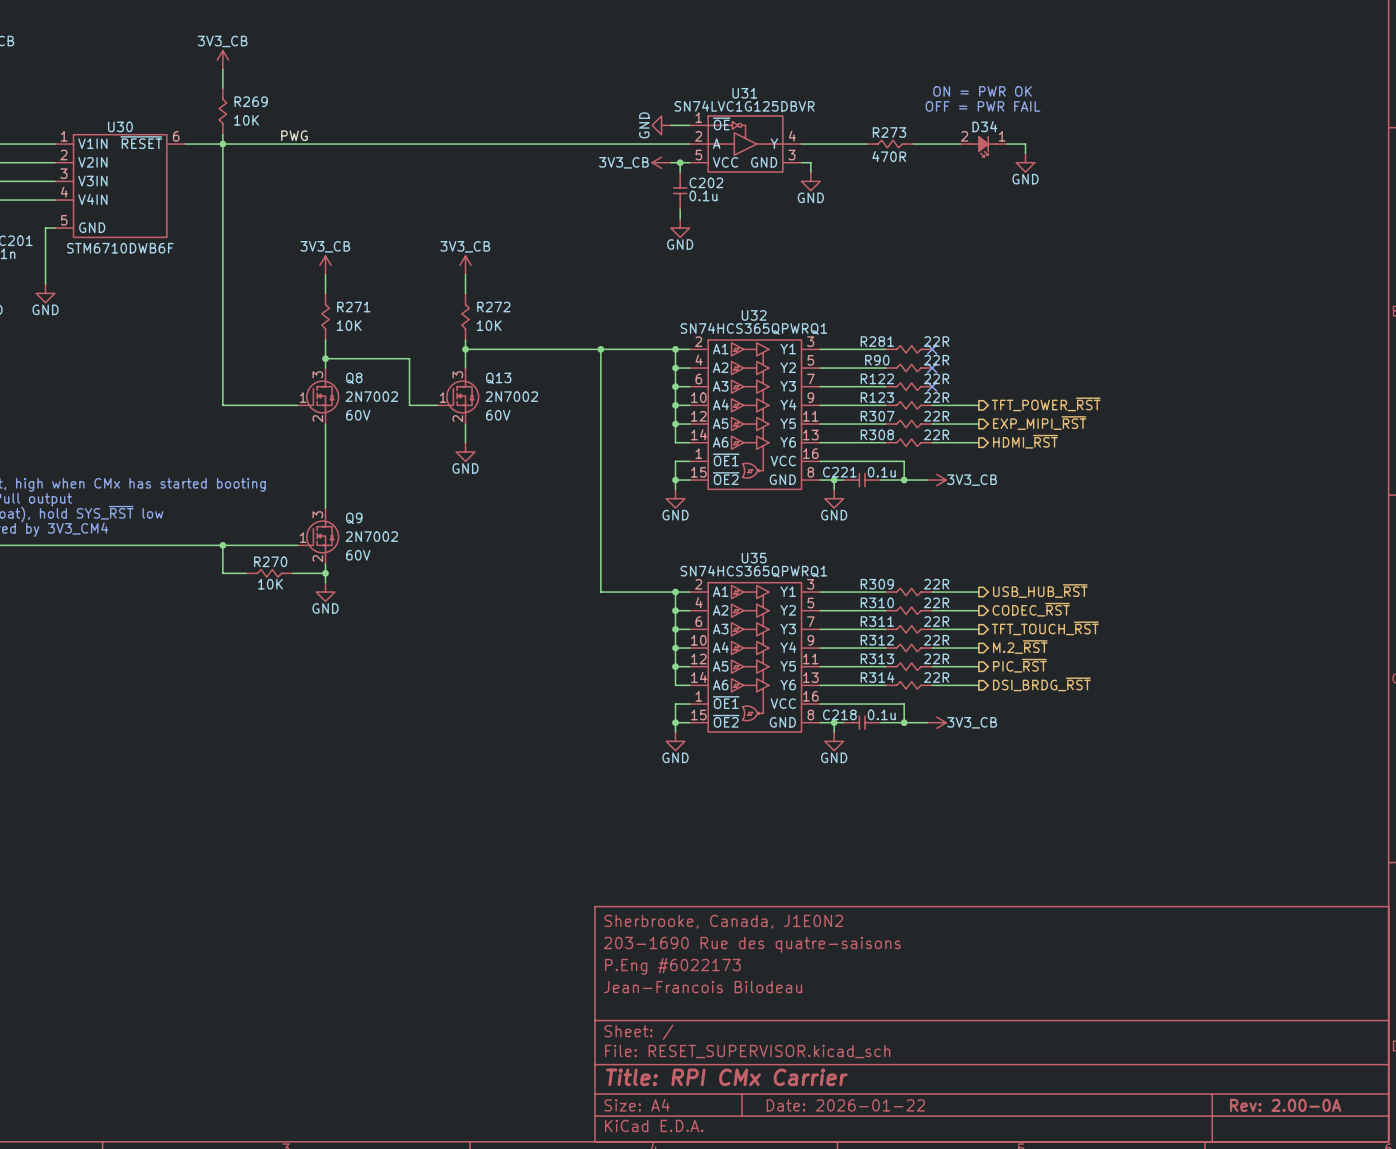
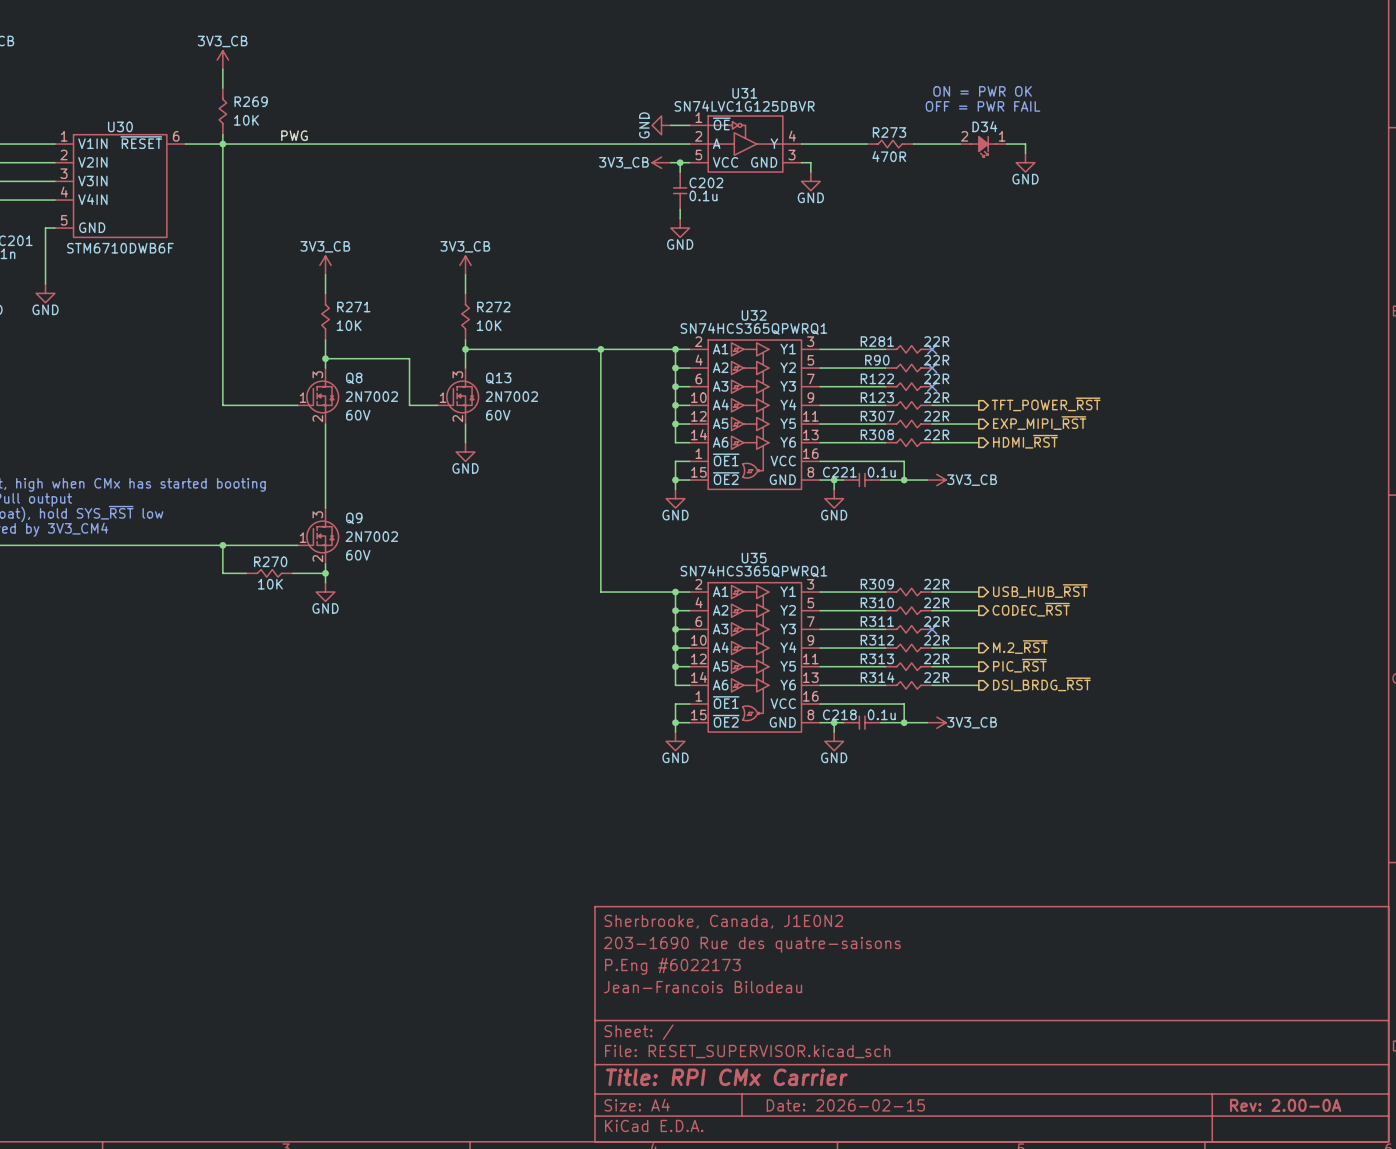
hierarchical label: TFT_TOUCH_~{RST} (1045, 628) -> none
wire: (932, 629) (978, 629) -> none
no-connect mark: none -> (932, 629)
title block: Date: 2026-01-22 (845, 1105) -> Date: 2026-02-15 (845, 1105)

